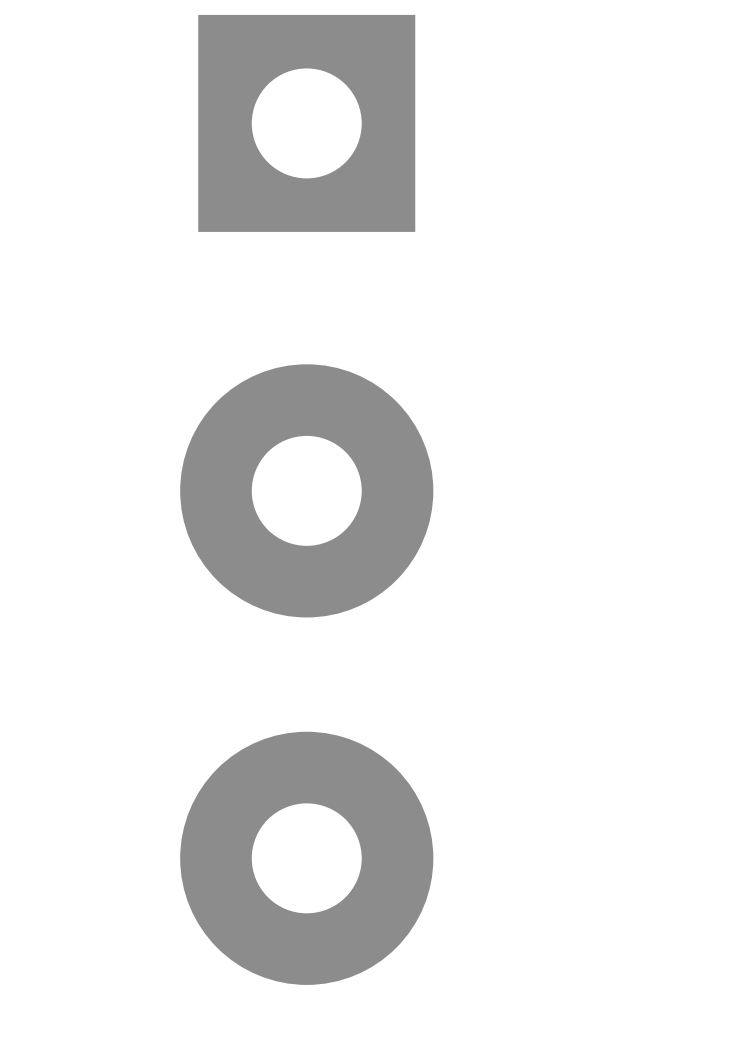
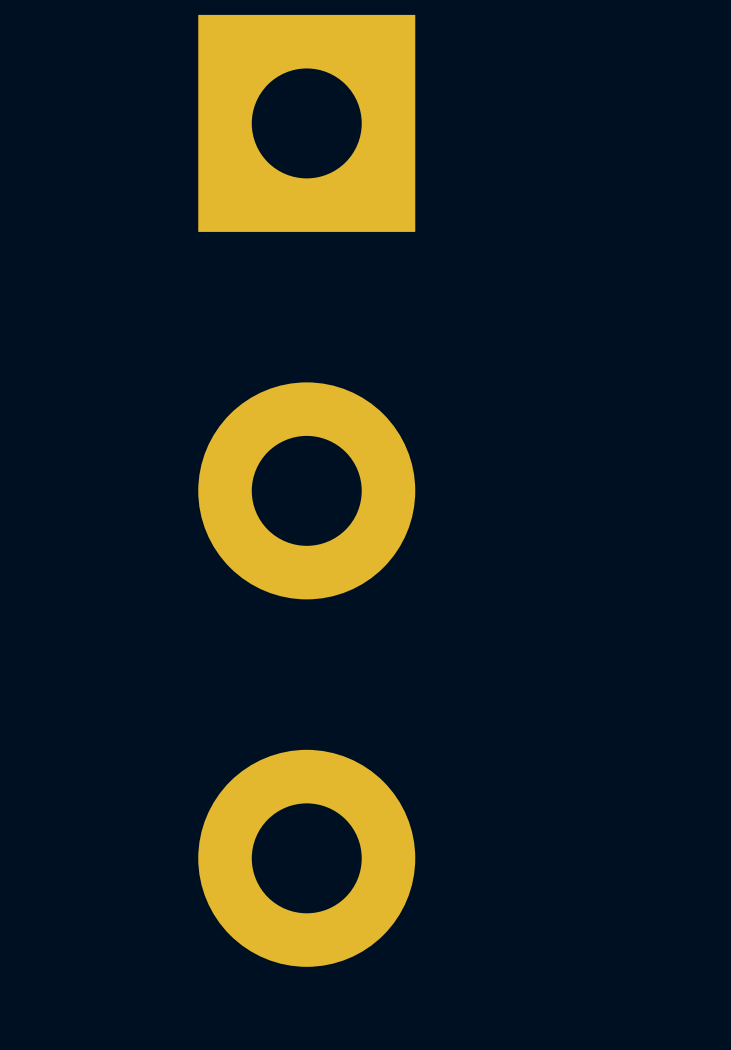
part footprint: [180, 14, 434, 985] -> [198, 14, 416, 967]

